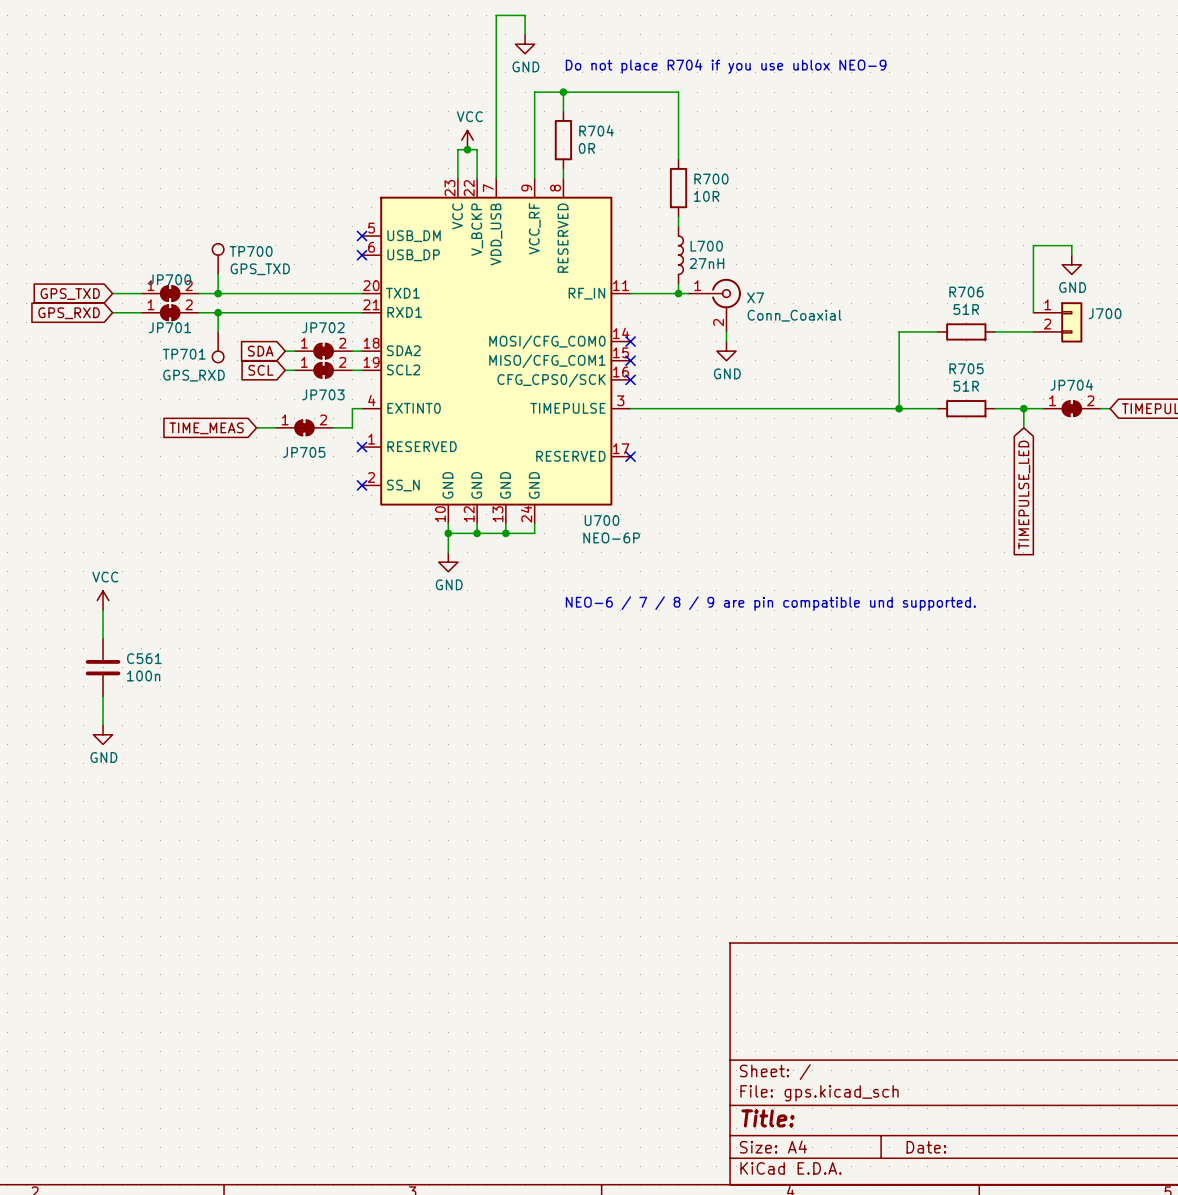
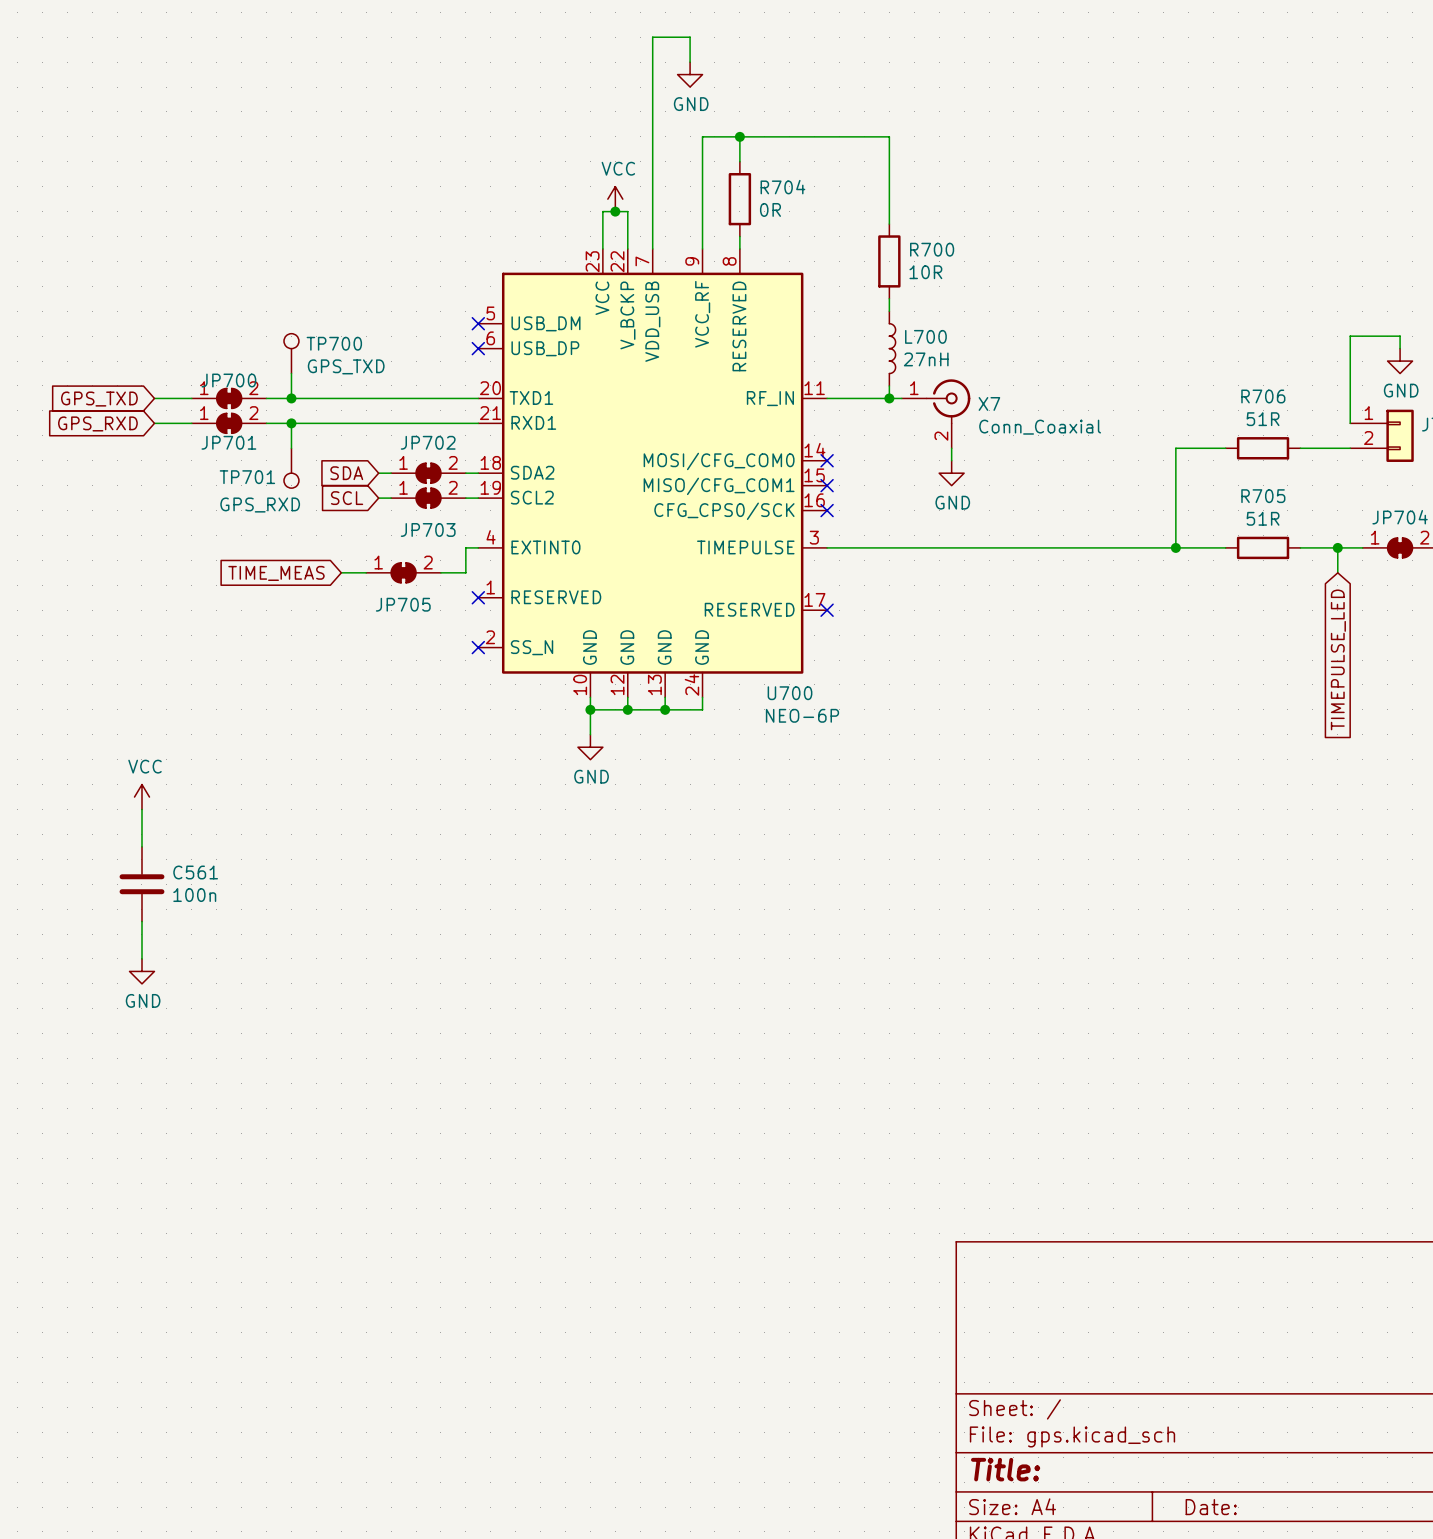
text: Do not place R704 if you use ublox NEO-9 (726, 66) -> none
text: NEO-6 / 7 / 8 / 9 are pin compatible und supported. (770, 603) -> none

